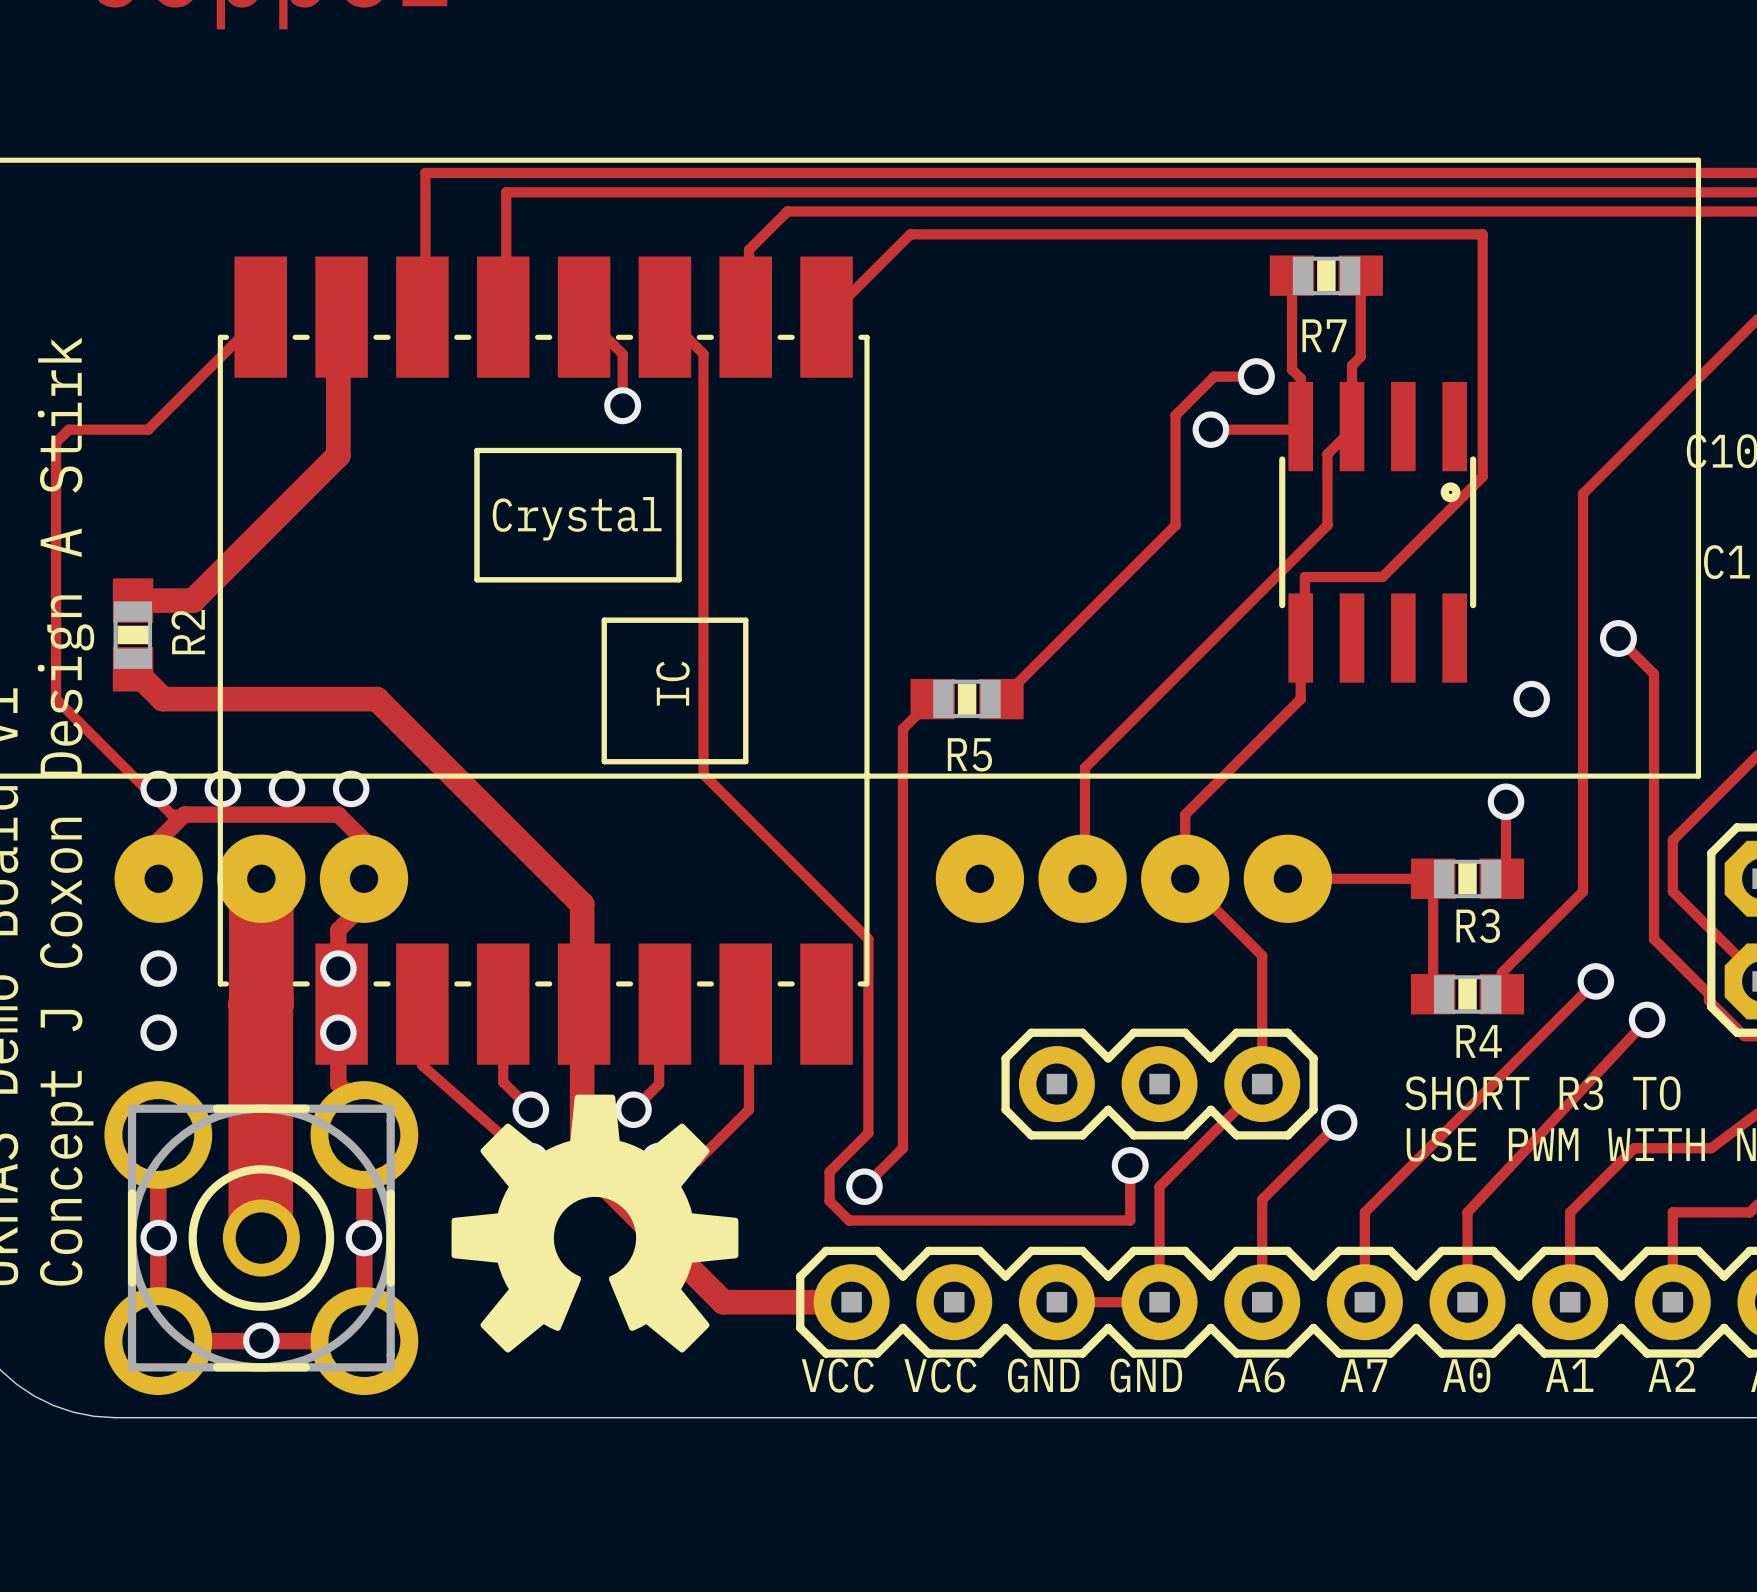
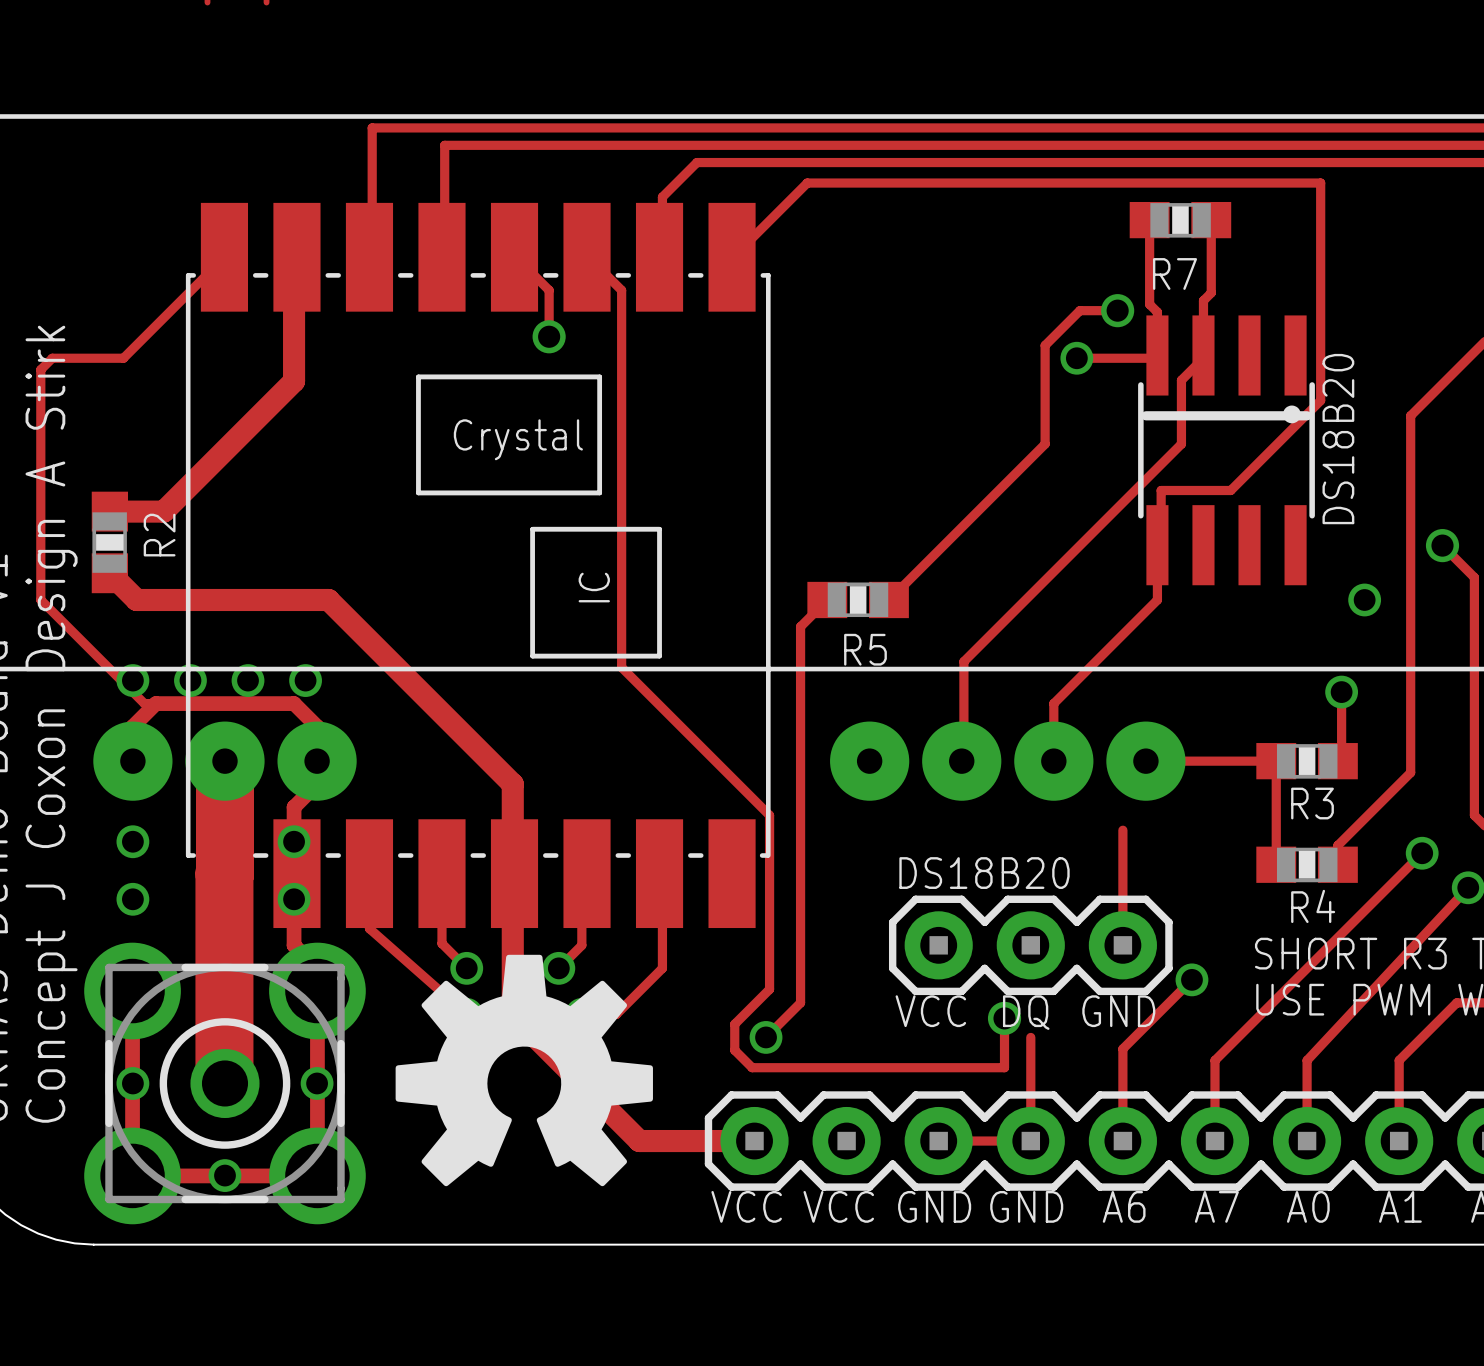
line: none -> (1145, 415) (1307, 415)
text: none -> DS18B20 (1338, 439)
track: (1185, 878) (1262, 955) -> none
text: none -> DS18B20 (984, 873)
track: (1262, 1084) (1159, 1186) -> none
text: none -> VCC (930, 1011)
text: none -> GND (1118, 1011)
text: none -> DQ (1026, 1012)

